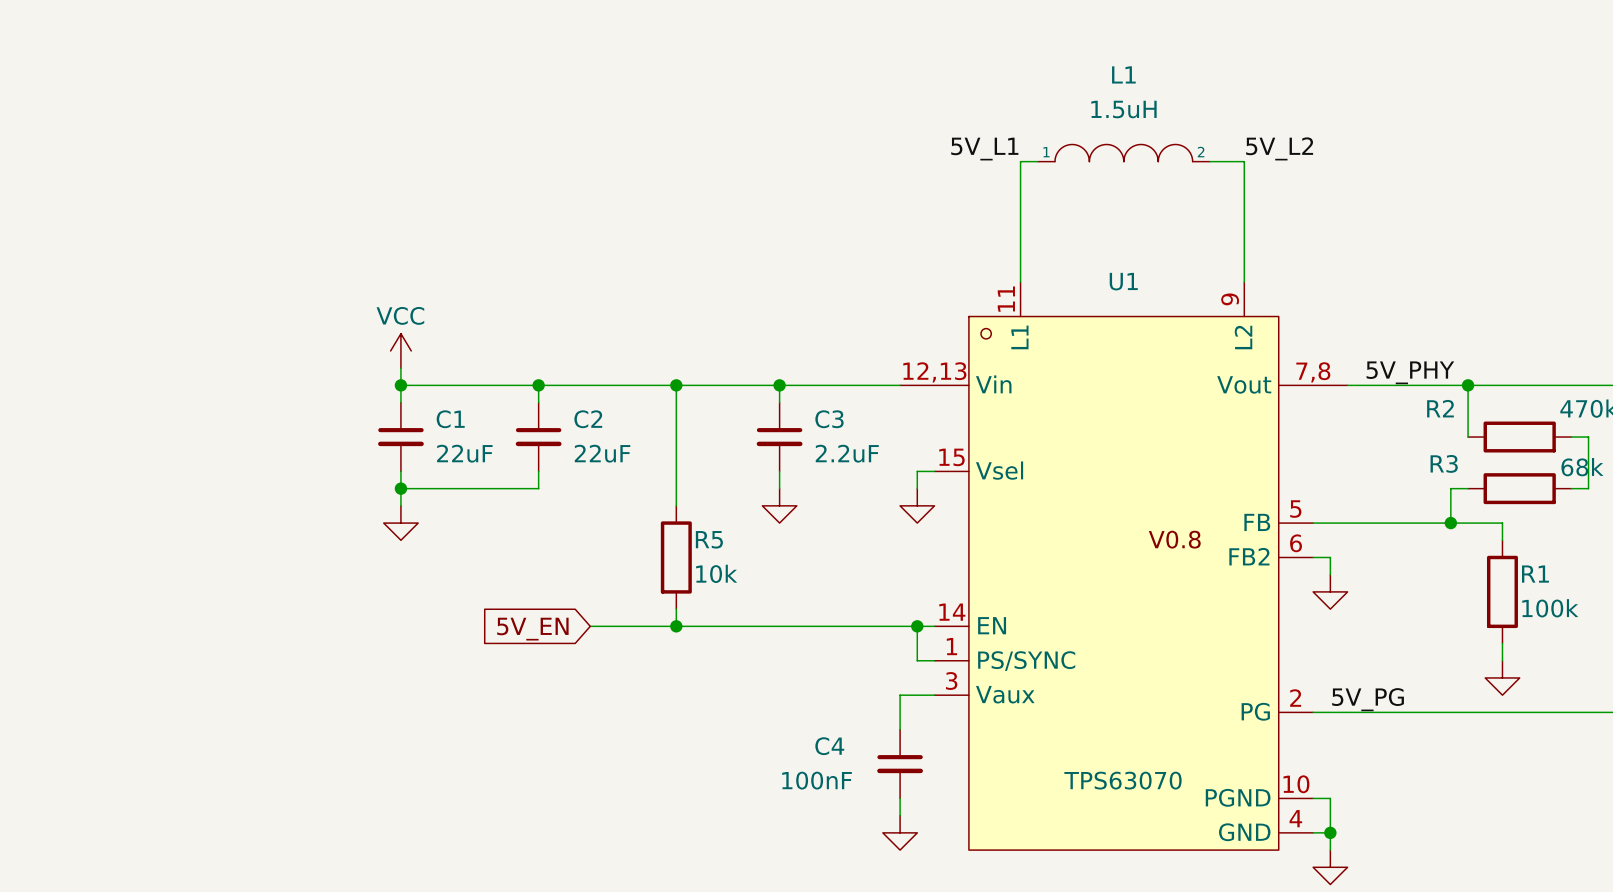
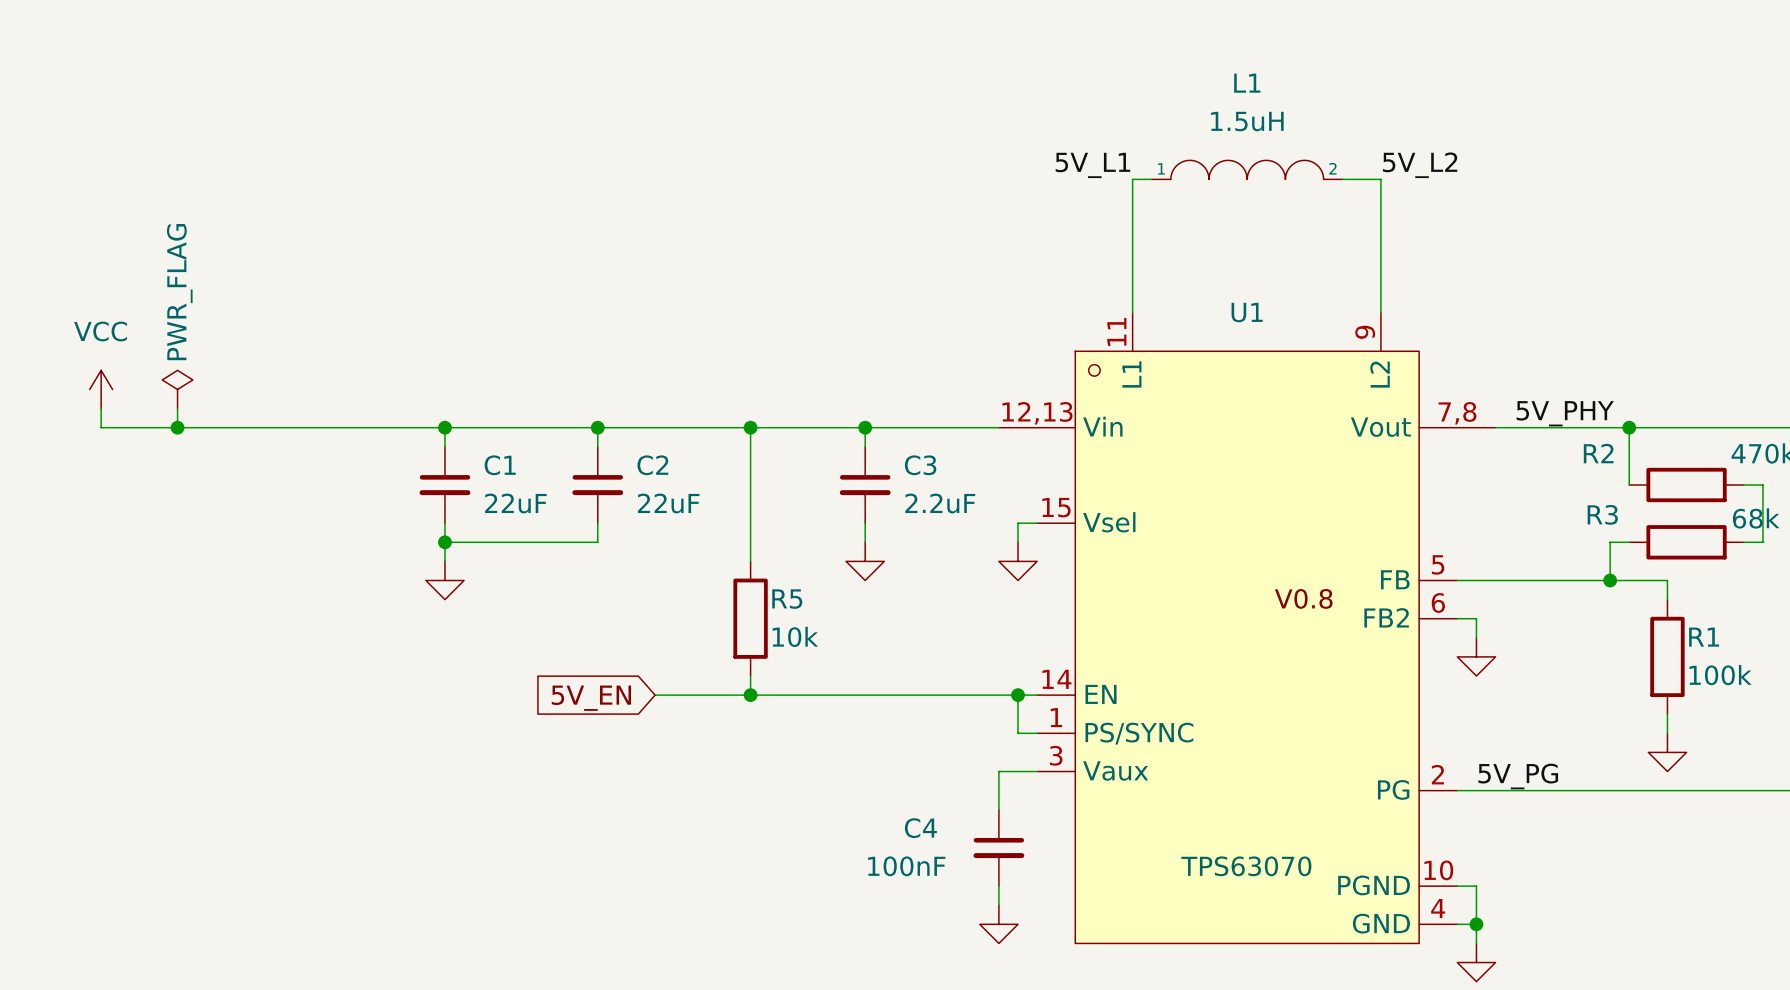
power symbol text position: VCC (400, 315) -> VCC (100, 331)
power symbol: none -> PWR_FLAG (177, 389)
power symbol position: VCC (400, 350) -> VCC (101, 389)
wire: none -> (177, 408) (177, 427)
wire: (400, 368) (400, 385) -> (101, 408) (101, 427) (444, 427)
junction: none -> (177, 427)

